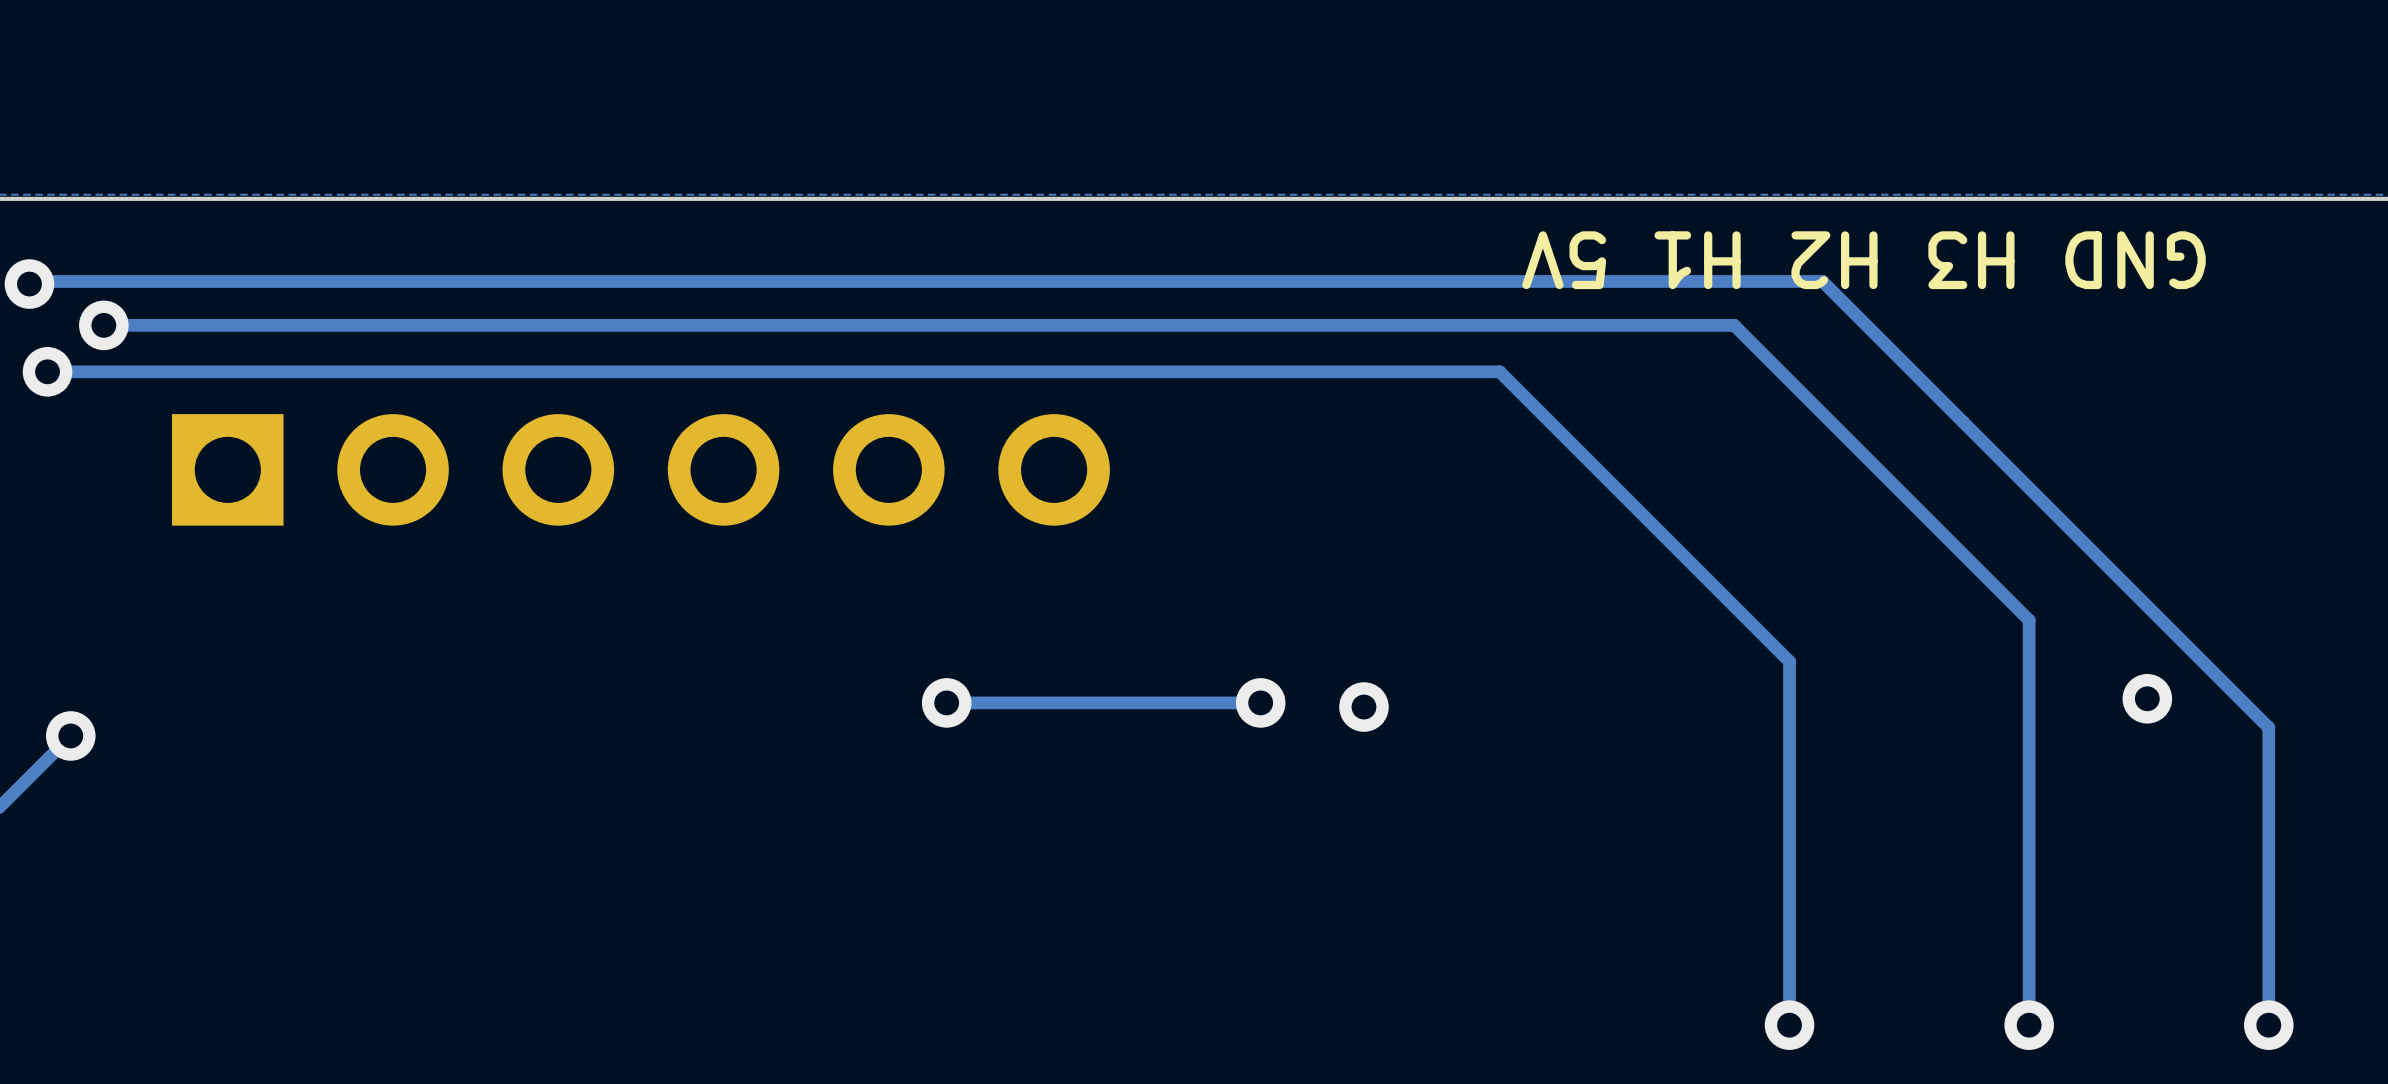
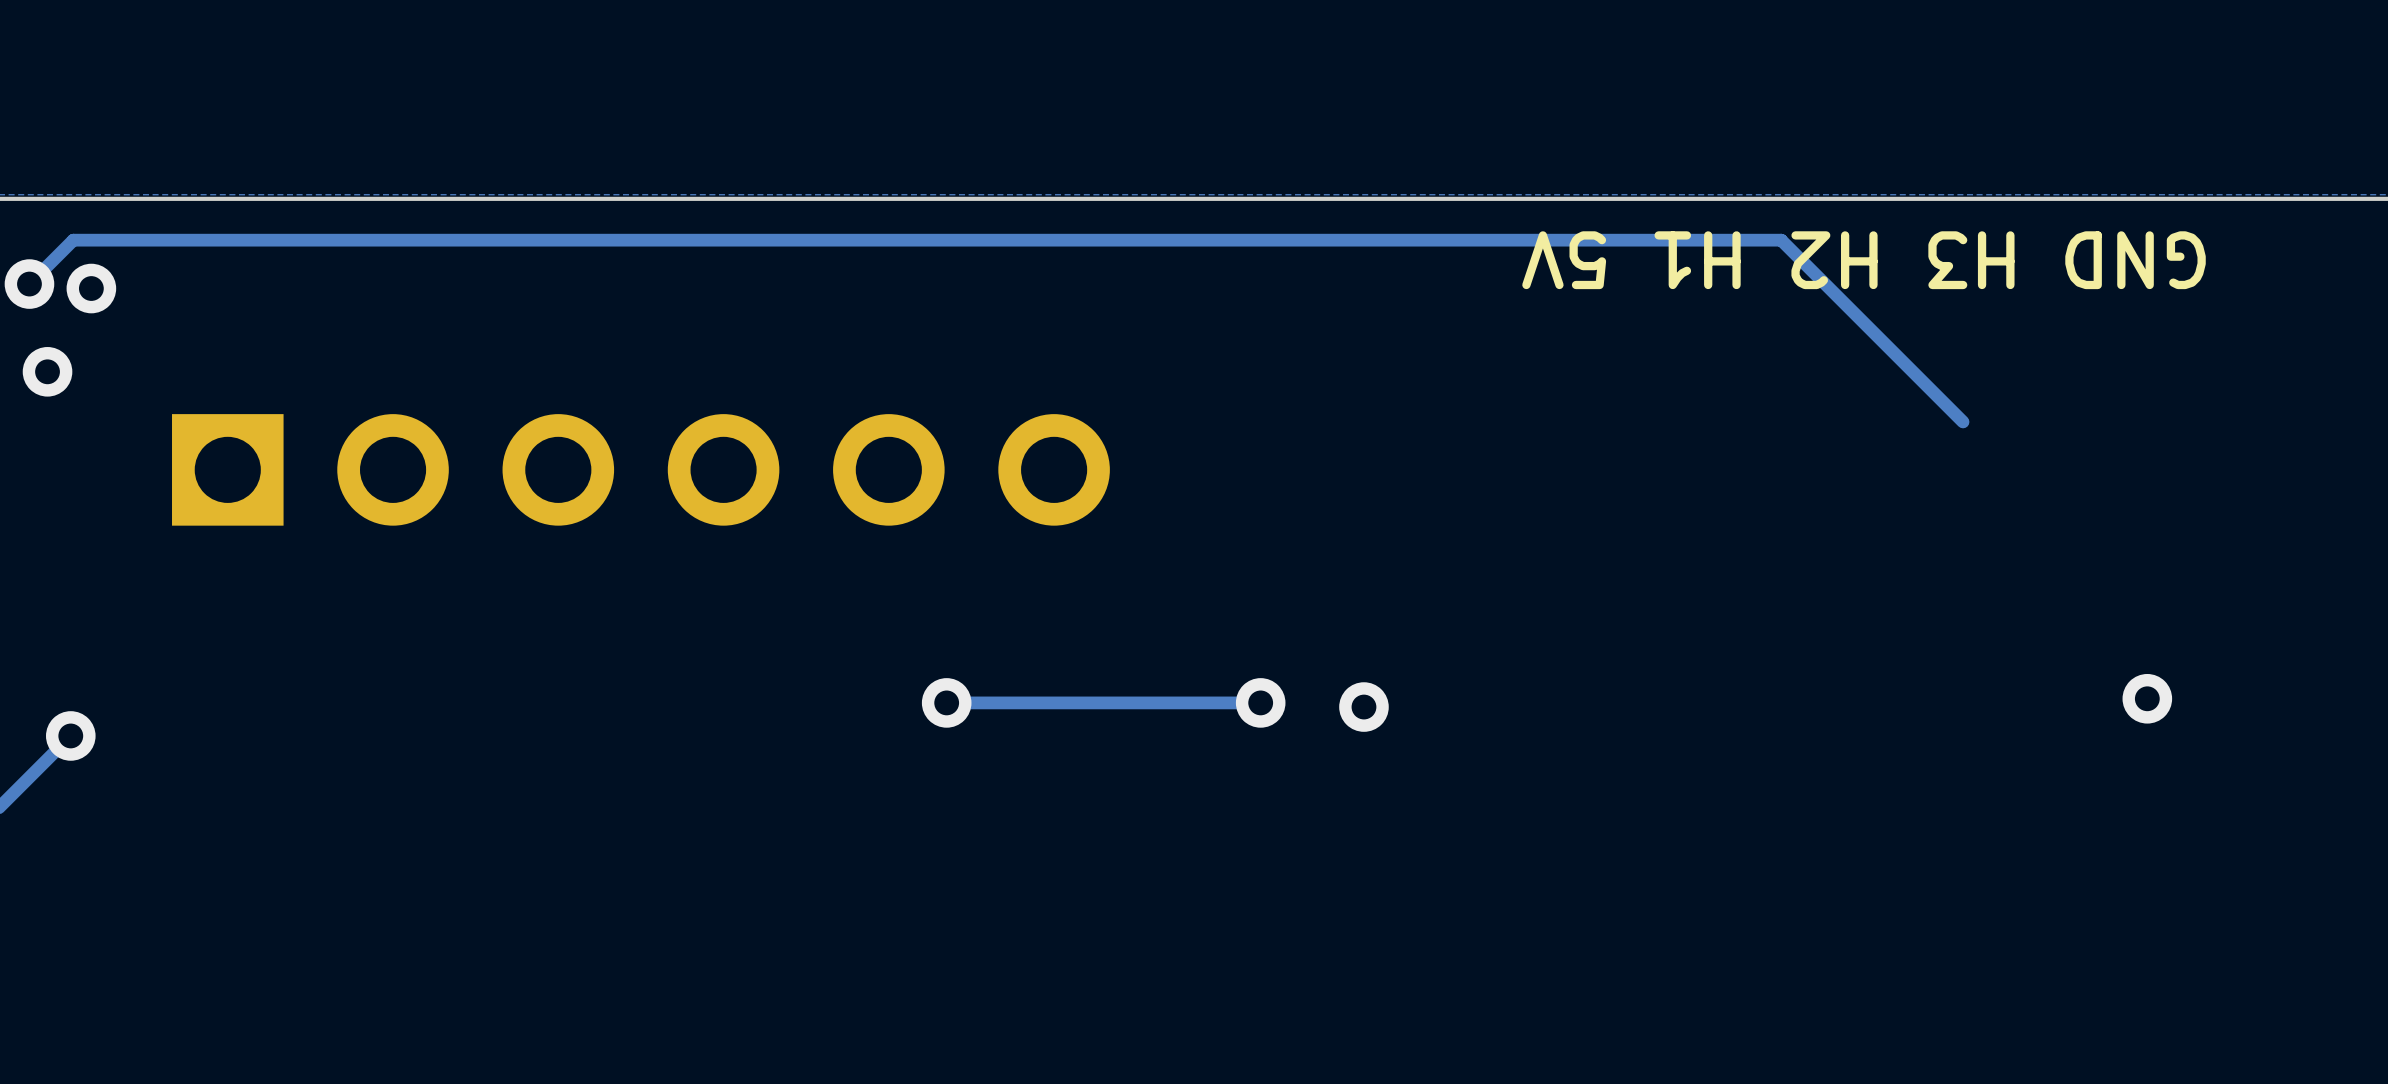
track: (1822, 281) (32, 281) -> (1822, 281) (1781, 240) (73, 240) (32, 281)
track: (103, 325) (1734, 325) (2029, 620) (2029, 1025) -> none
via position: (103, 325) -> (91, 288)
track: (47, 371) (1499, 371) (1789, 661) (1789, 1025) -> none
track: (1963, 421) (2268, 727) (2268, 1025) -> none
via: (1789, 1025) -> none
via: (2029, 1025) -> none
via: (2268, 1025) -> none

